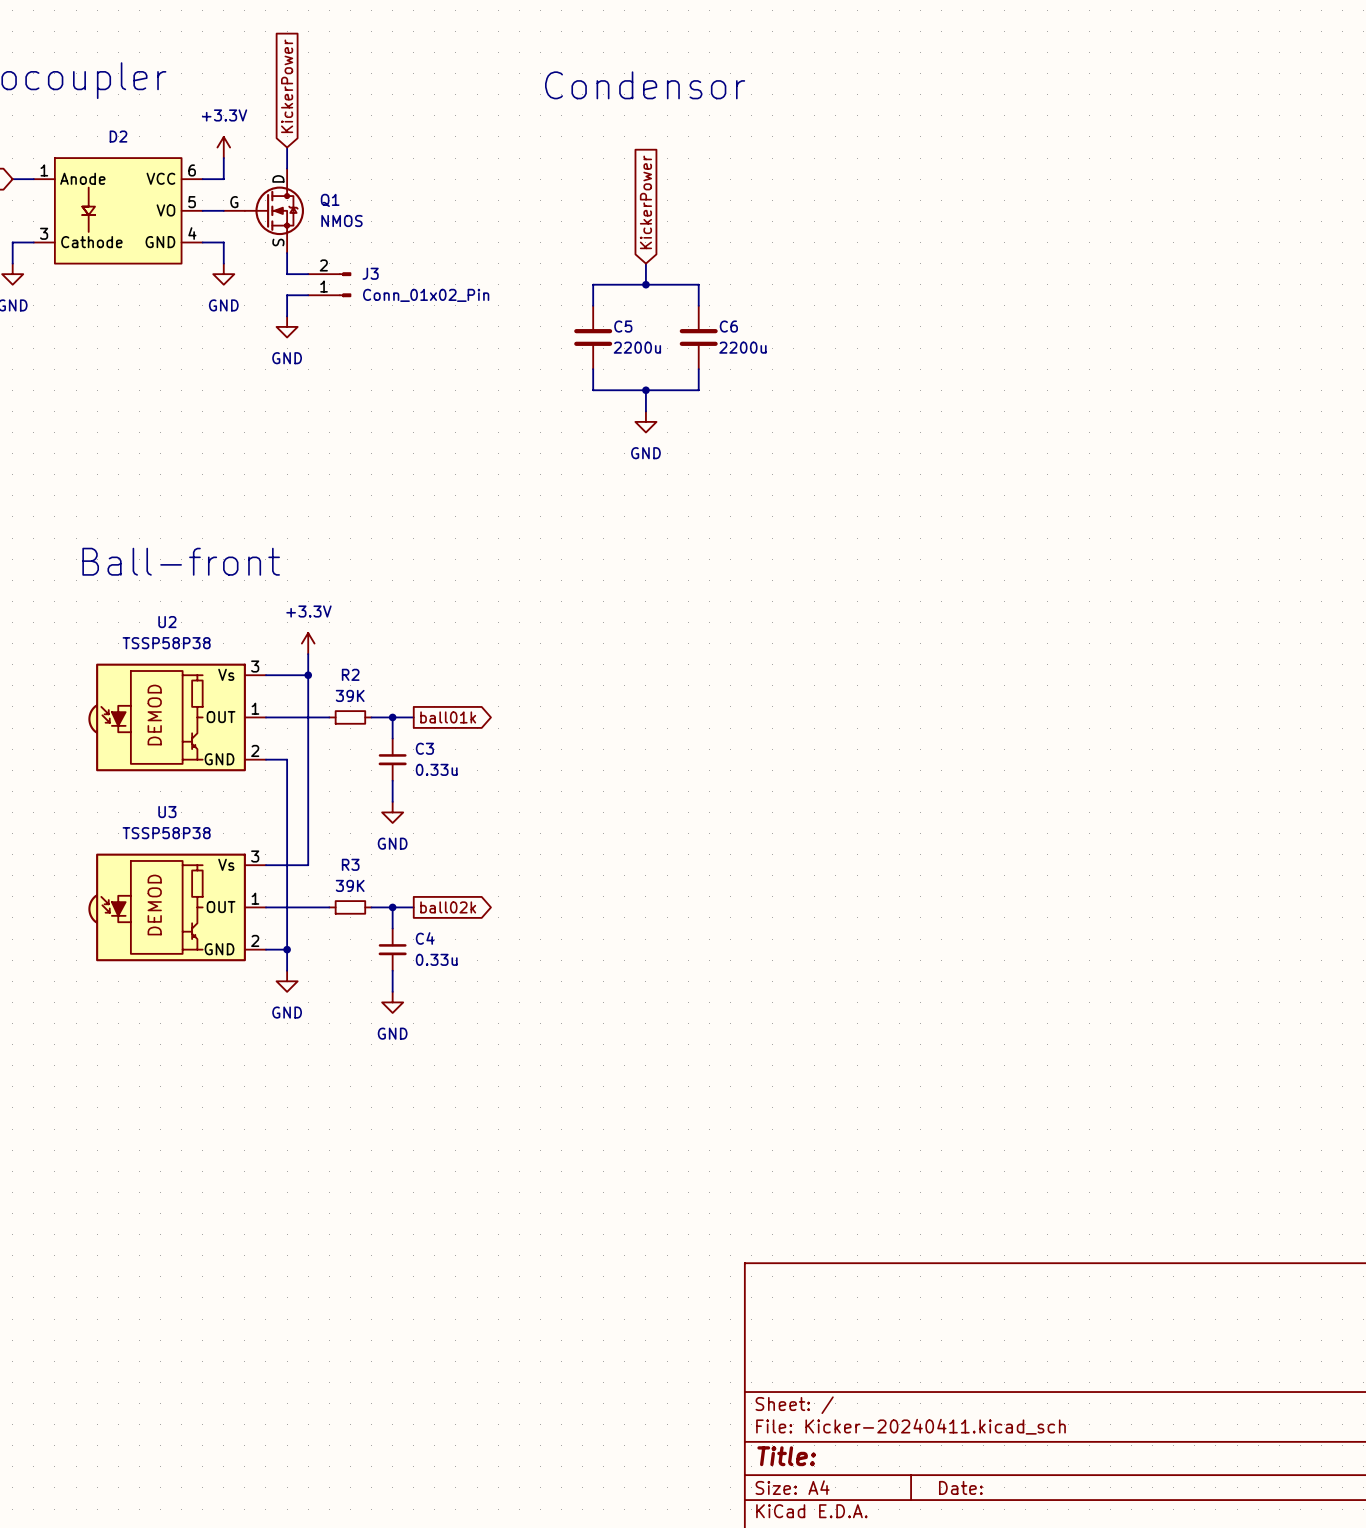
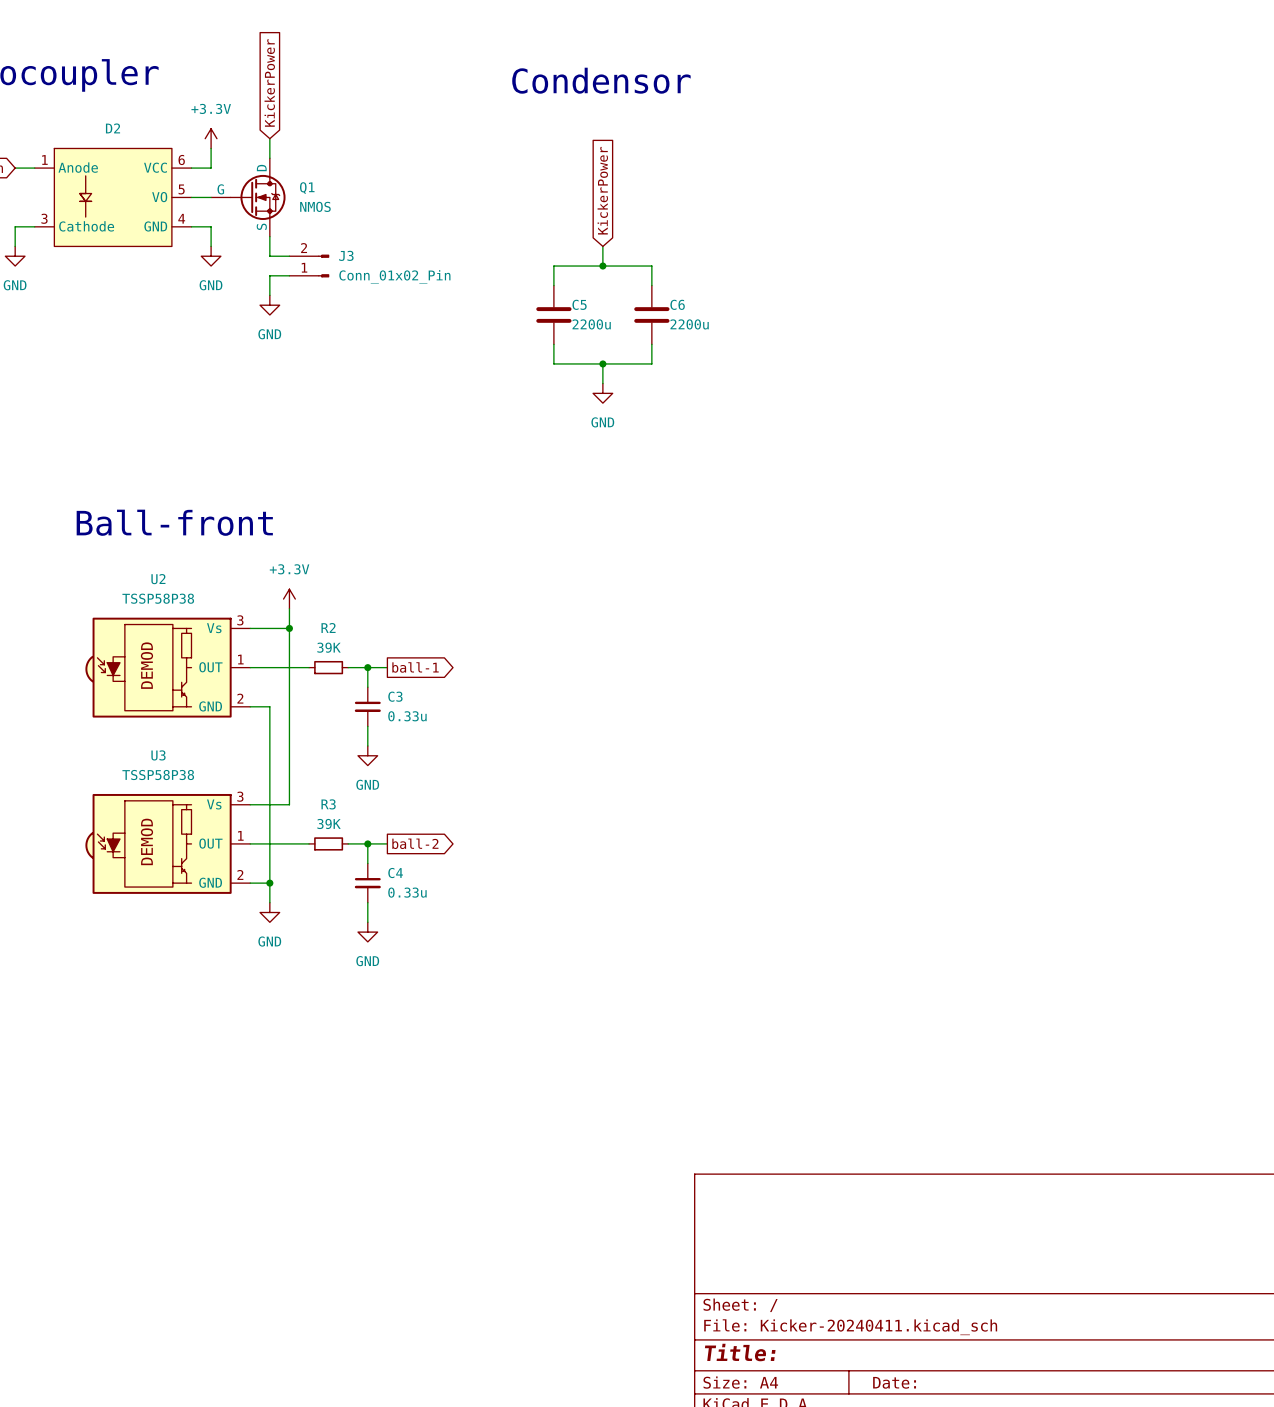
global label: ball01k (448, 717) -> ball-1 (415, 667)
global label: ball02k (448, 907) -> ball-2 (415, 843)

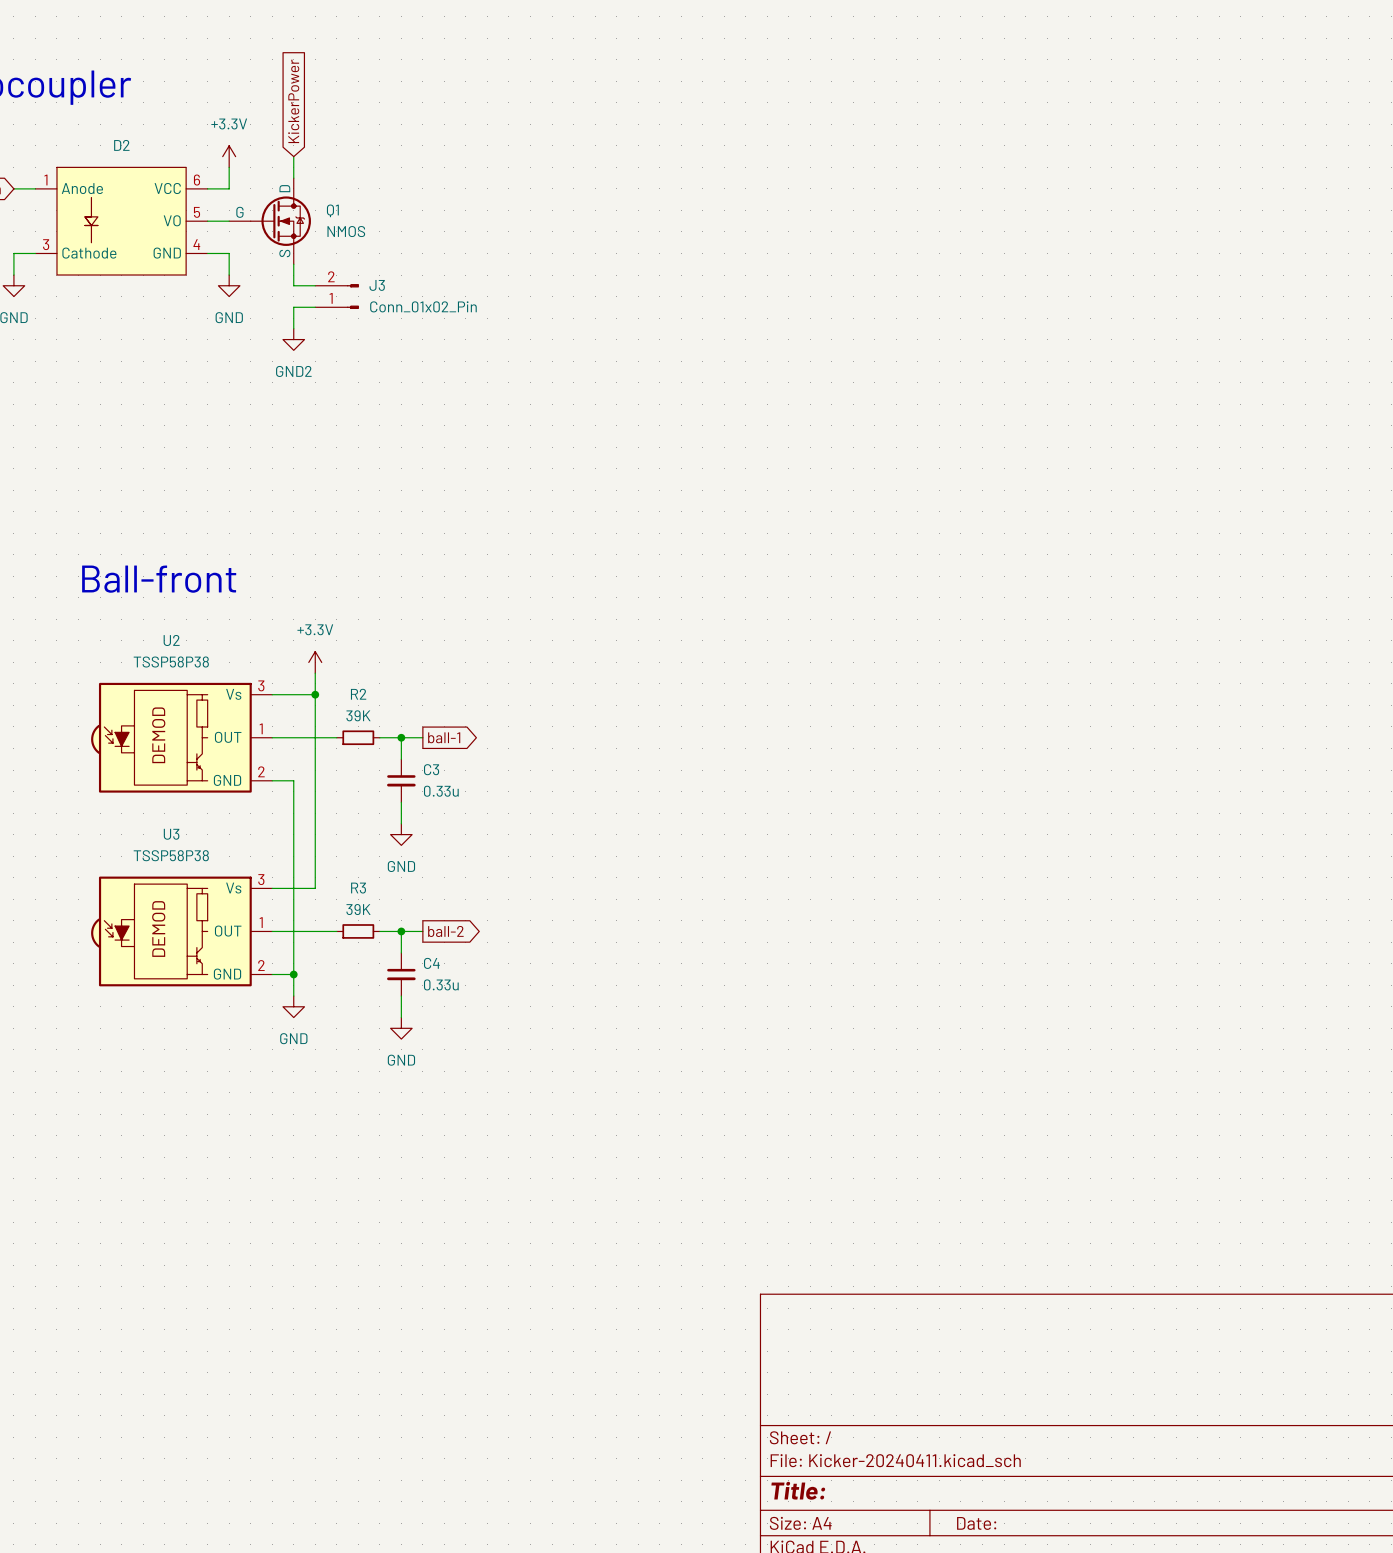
text: Condensor (601, 80) -> none
global label: KickerPower (602, 190) -> none
wire: (602, 246) (602, 266) -> none
junction: (602, 266) -> none
wire: (553, 285) (553, 266) (651, 266) (651, 285) -> none
power symbol: GND (269, 305) -> GND2 (293, 339)
C5: 2200u (553, 314) -> none
C6: 2200u (651, 314) -> none
wire: (553, 344) (553, 363) (651, 363) (651, 344) -> none
wire: (602, 363) (602, 383) -> none
junction: (602, 363) -> none
power symbol: GND (602, 393) -> none

